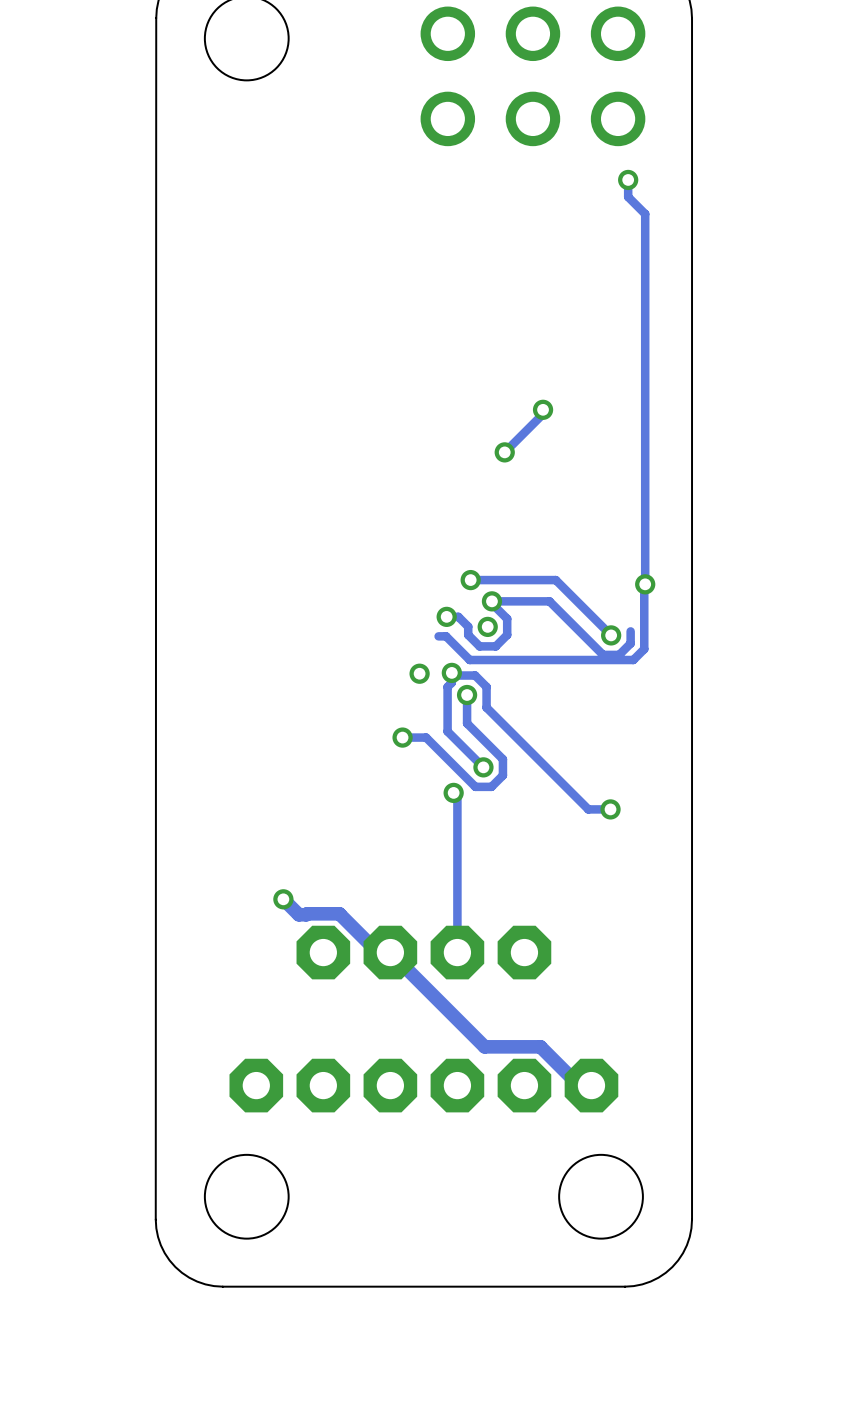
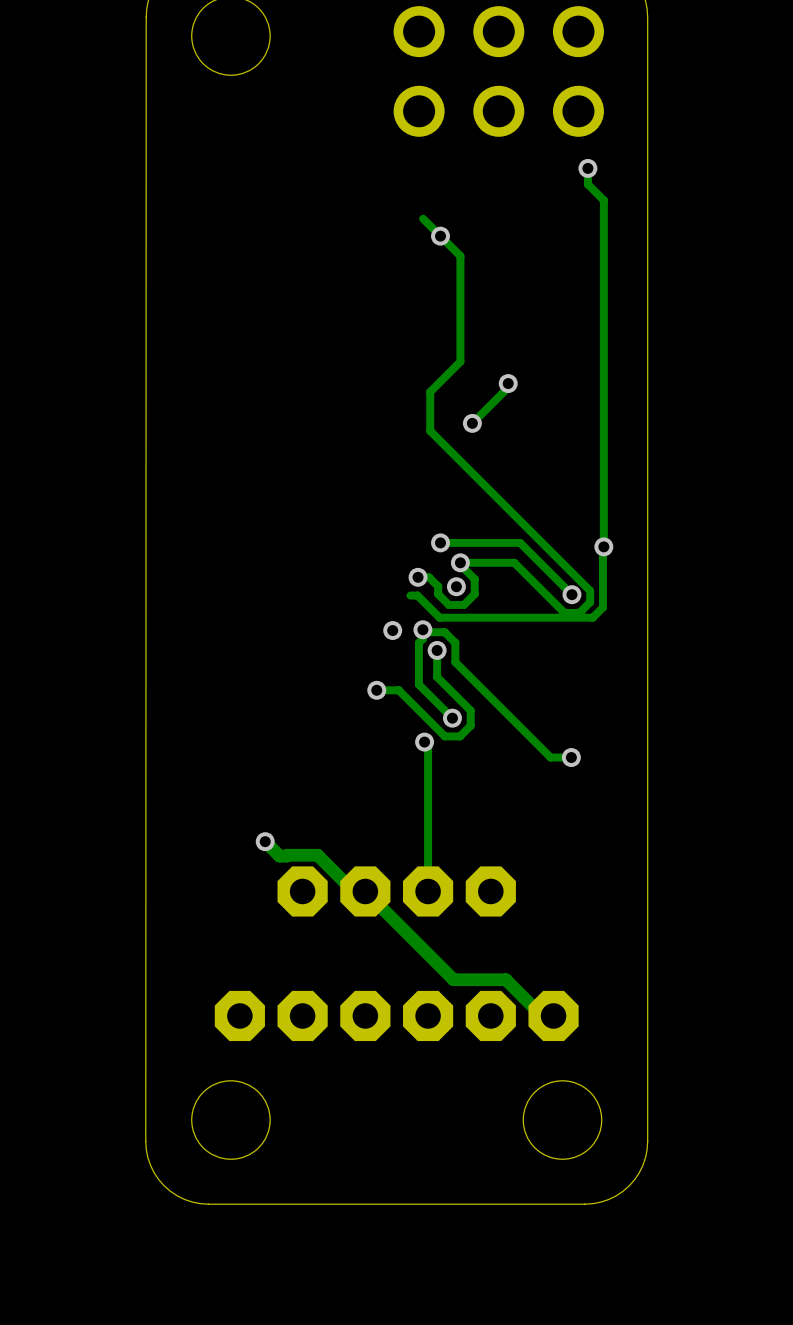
track: none -> (423, 218) (460, 256) (460, 361) (430, 391) (430, 430) (590, 590)
via: none -> (440, 236)

